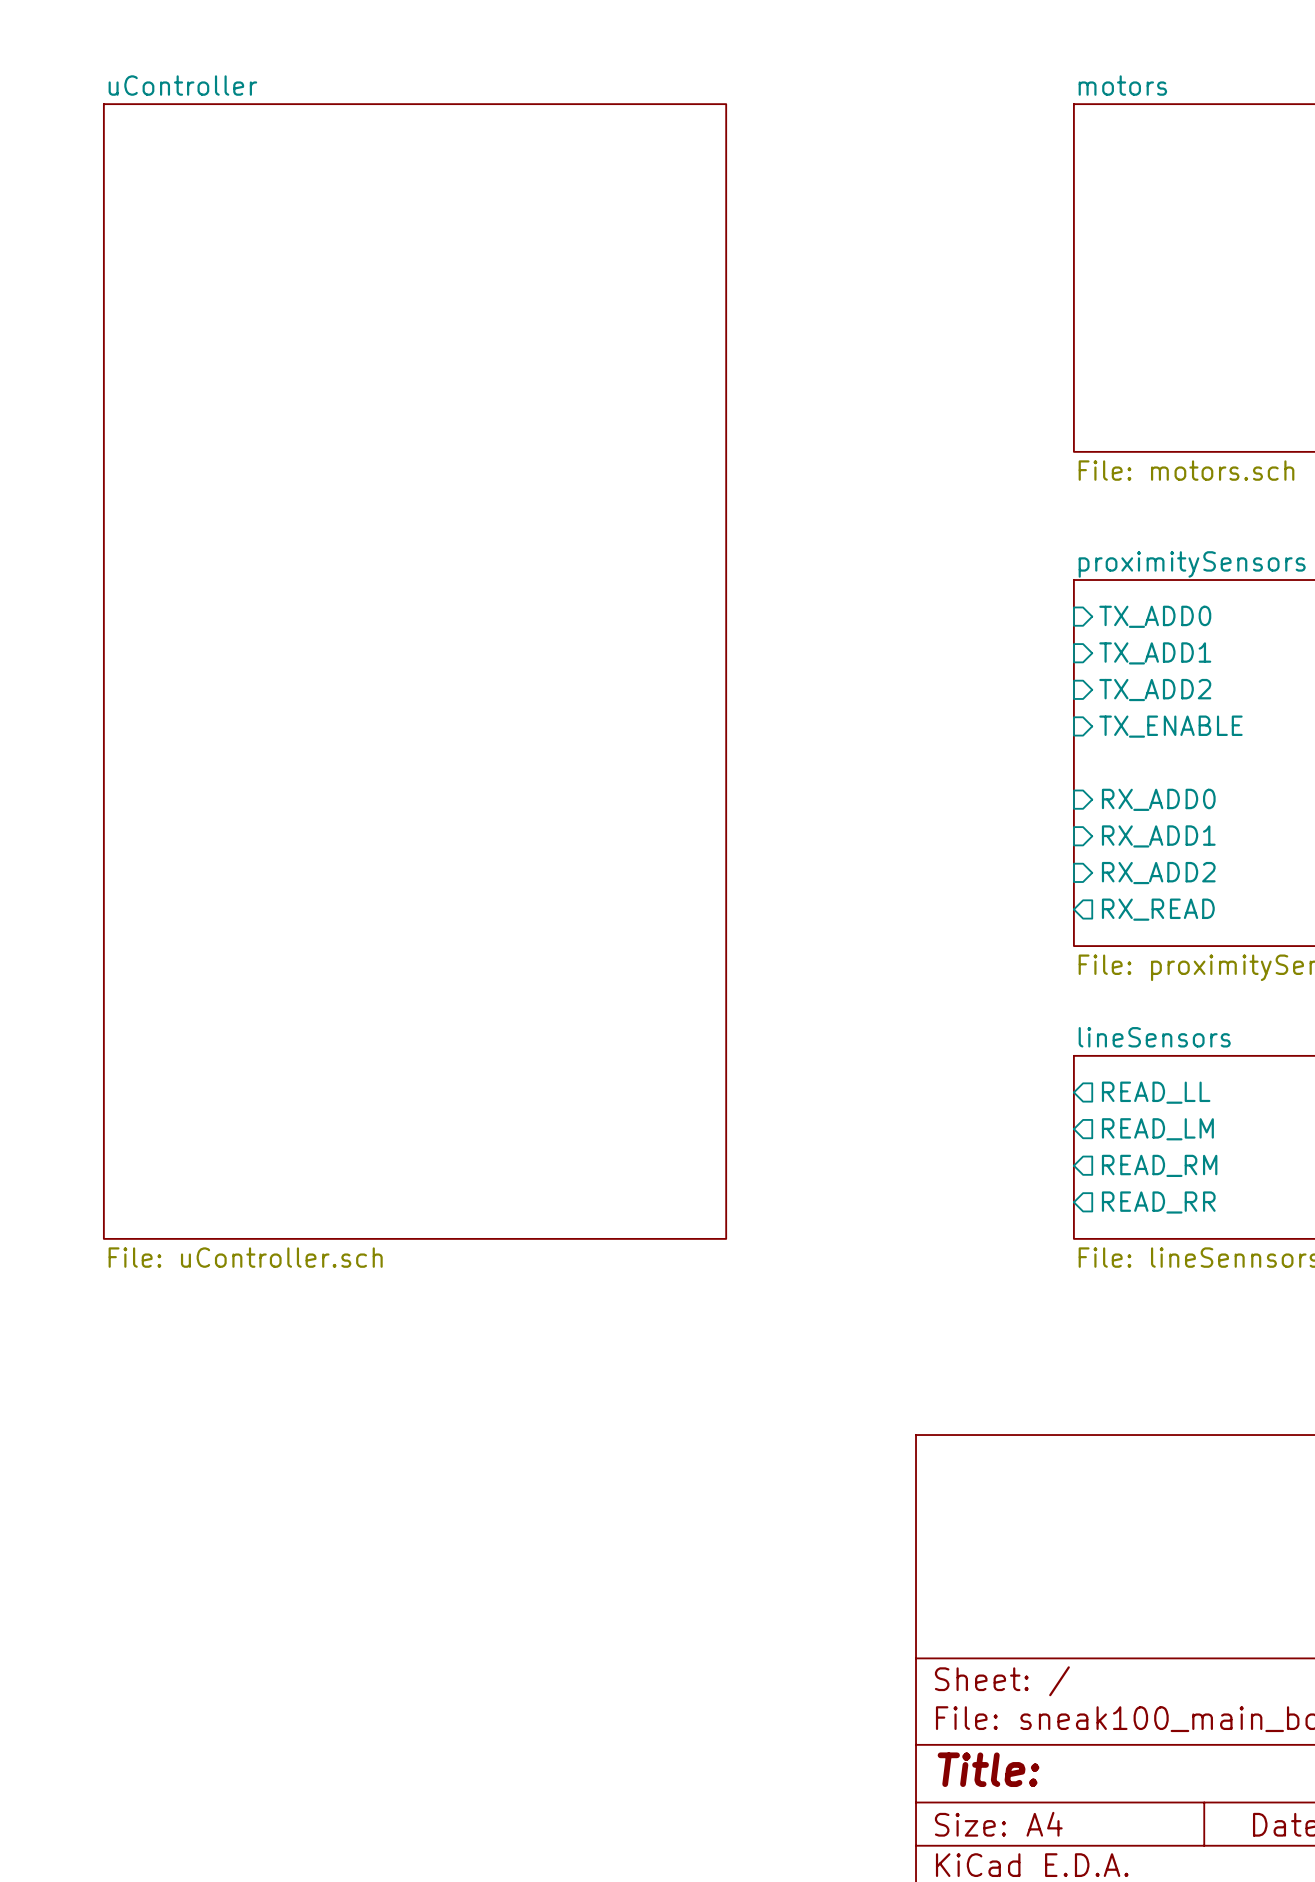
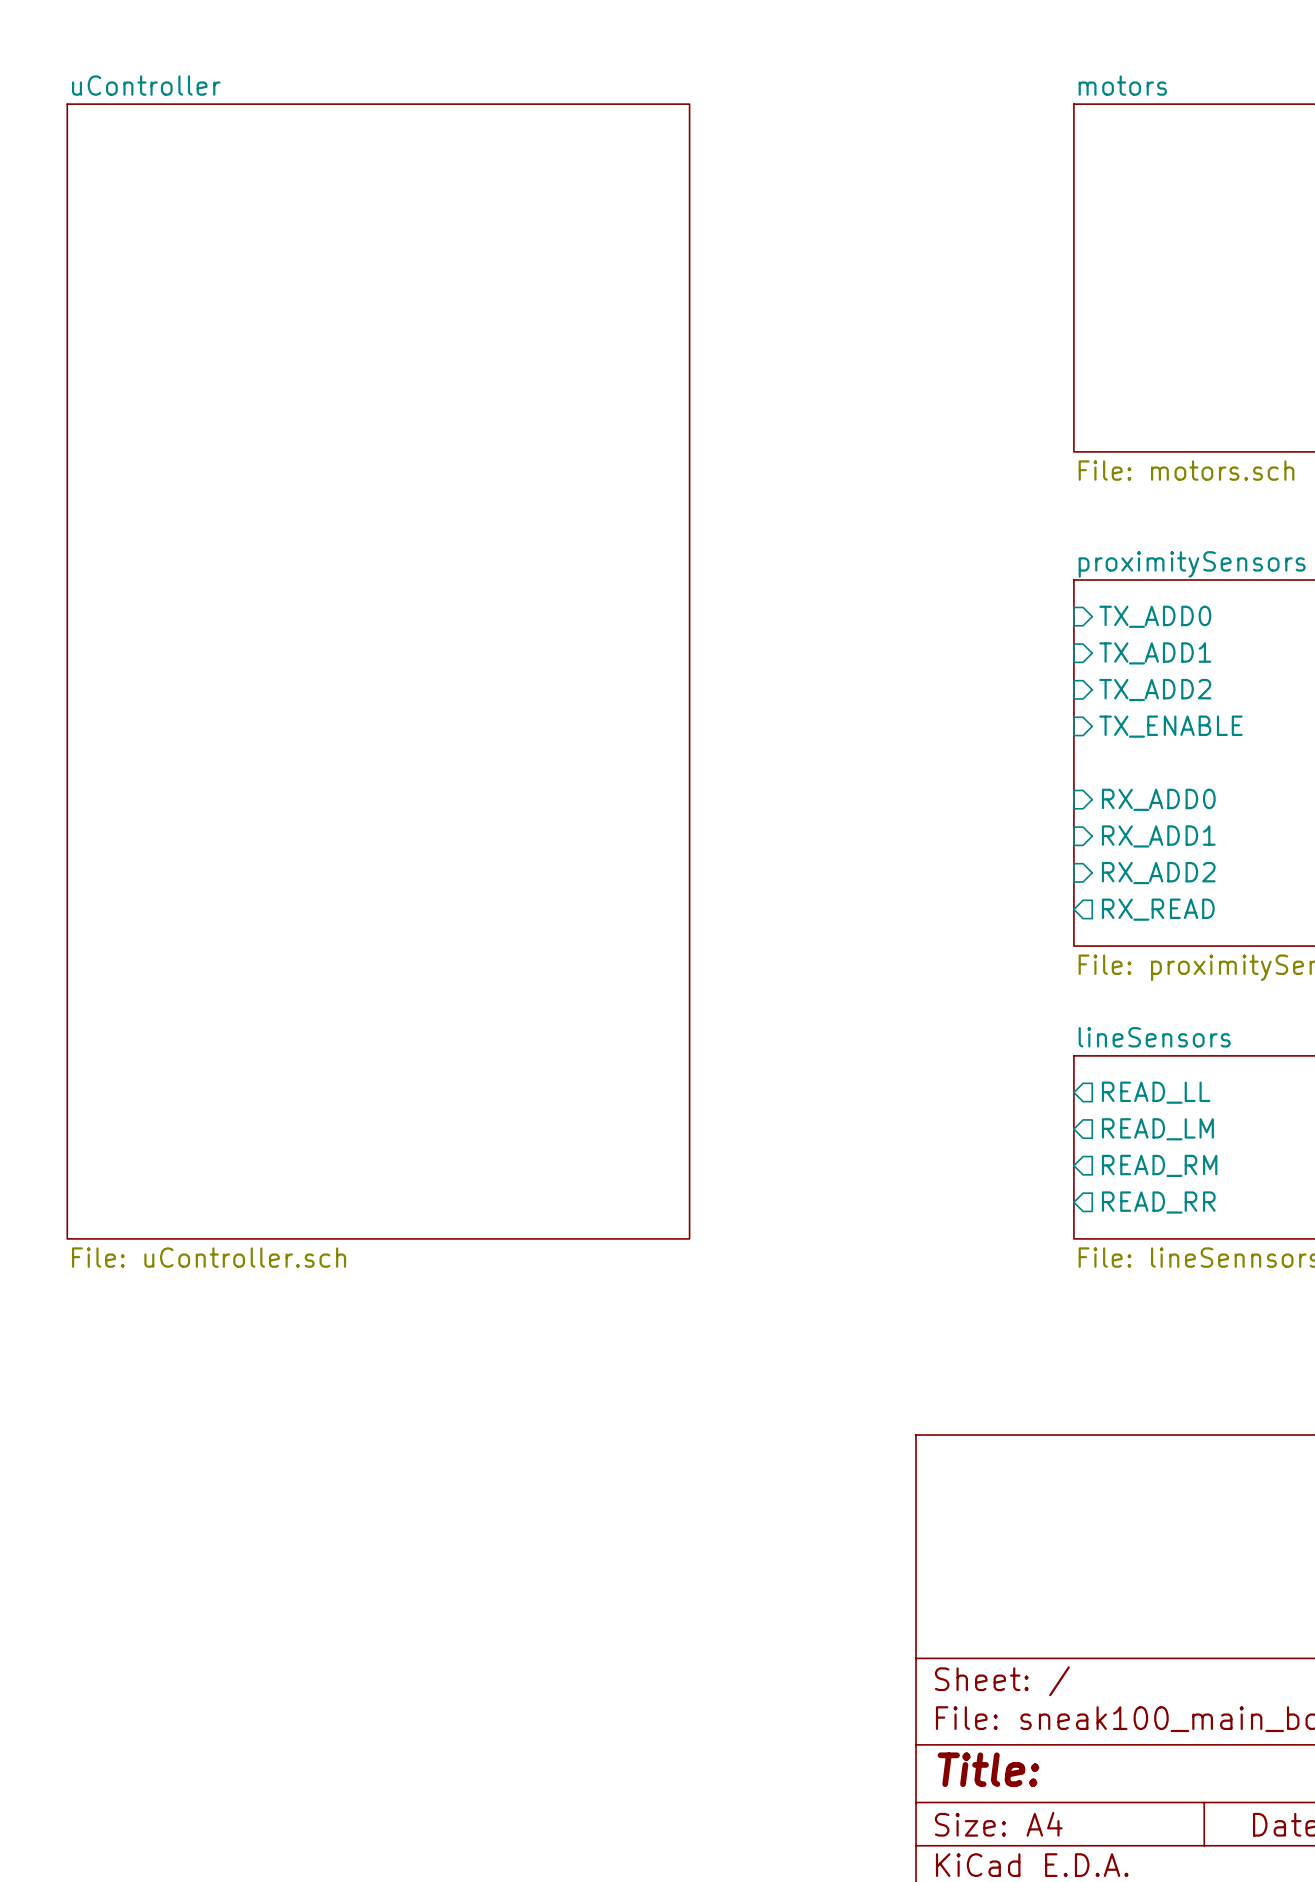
sheet uController position: (415, 671) -> (378, 671)

